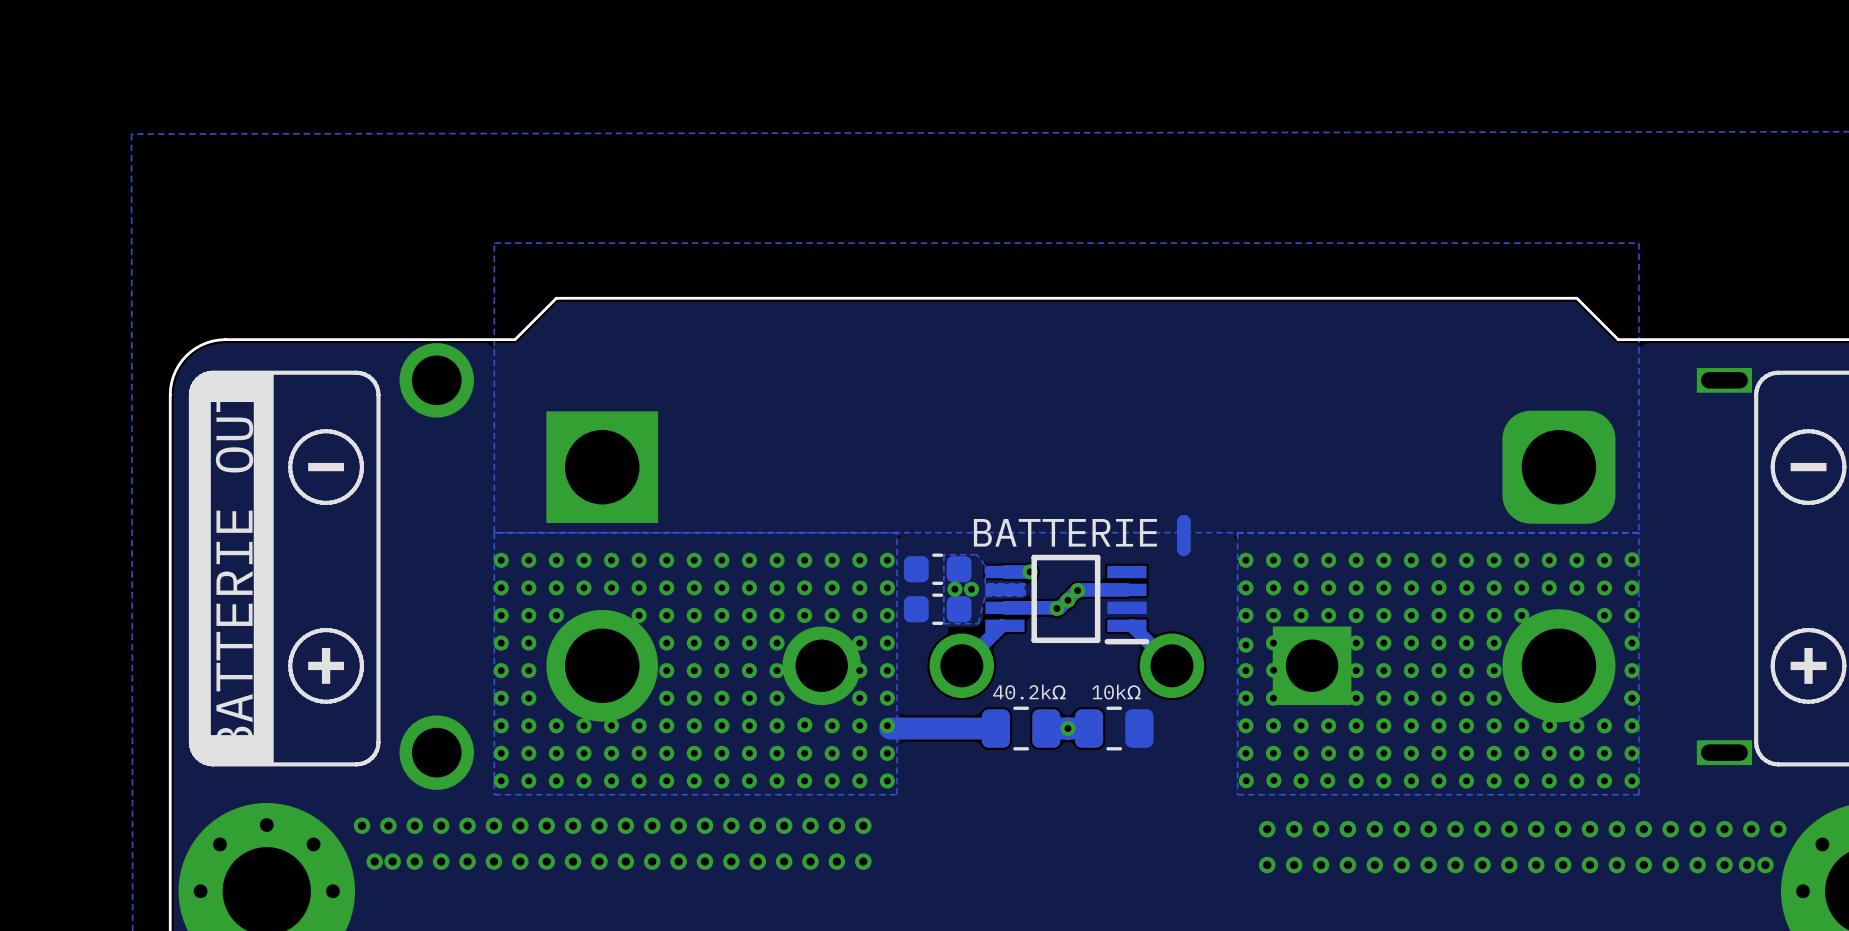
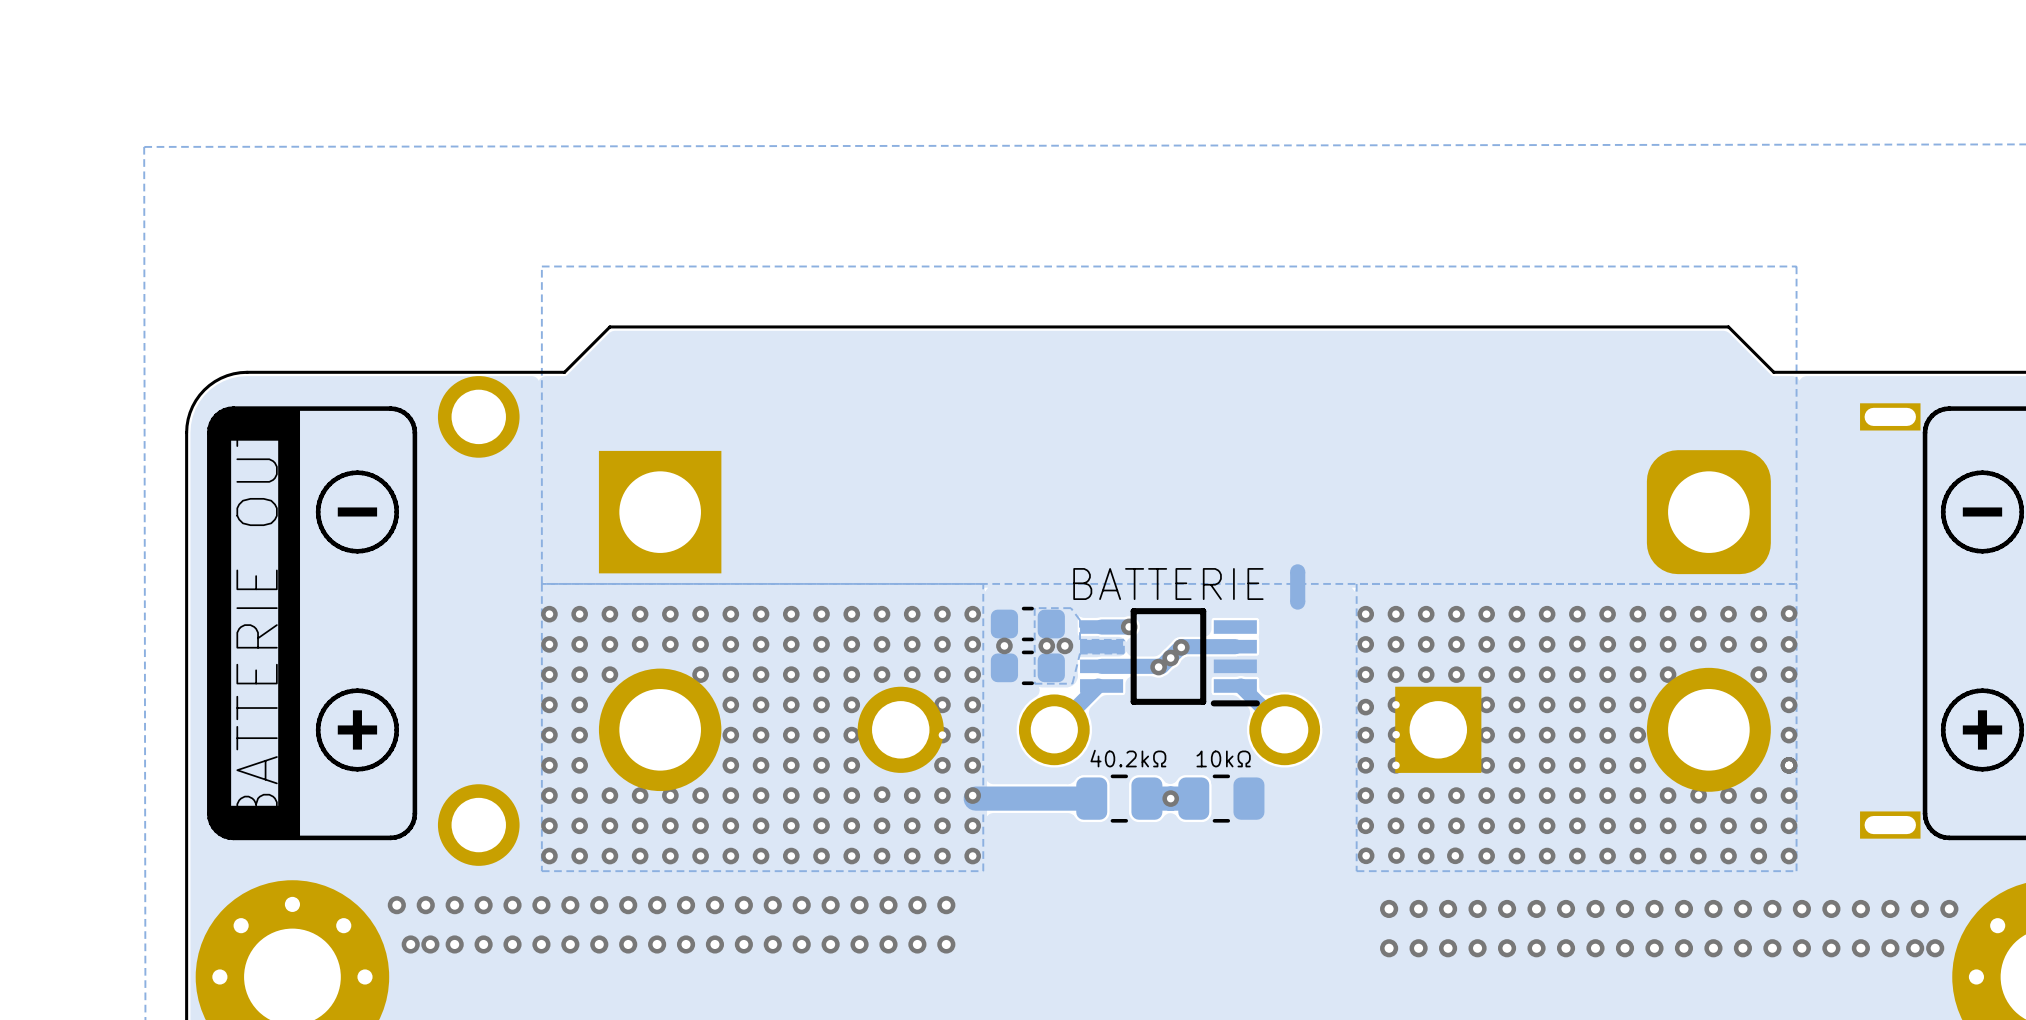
via: none -> (1004, 645)

